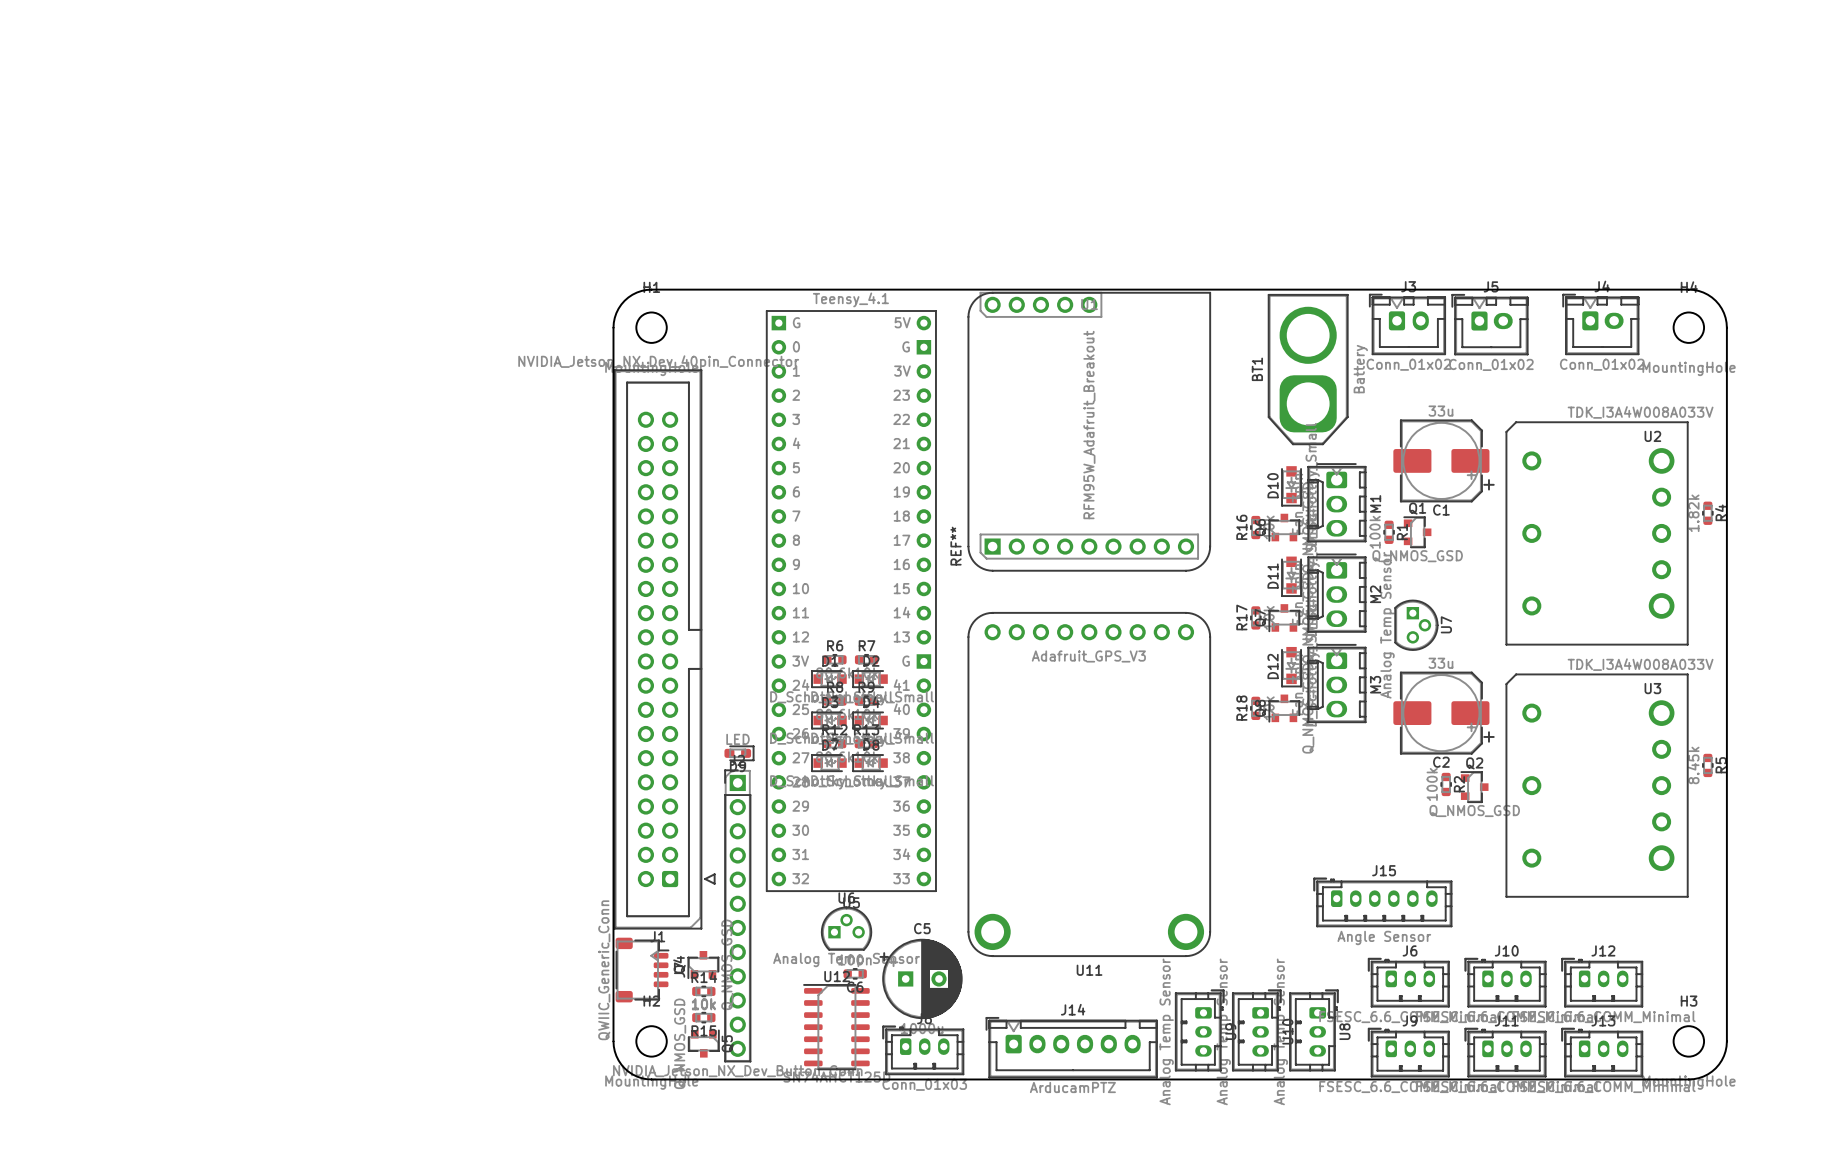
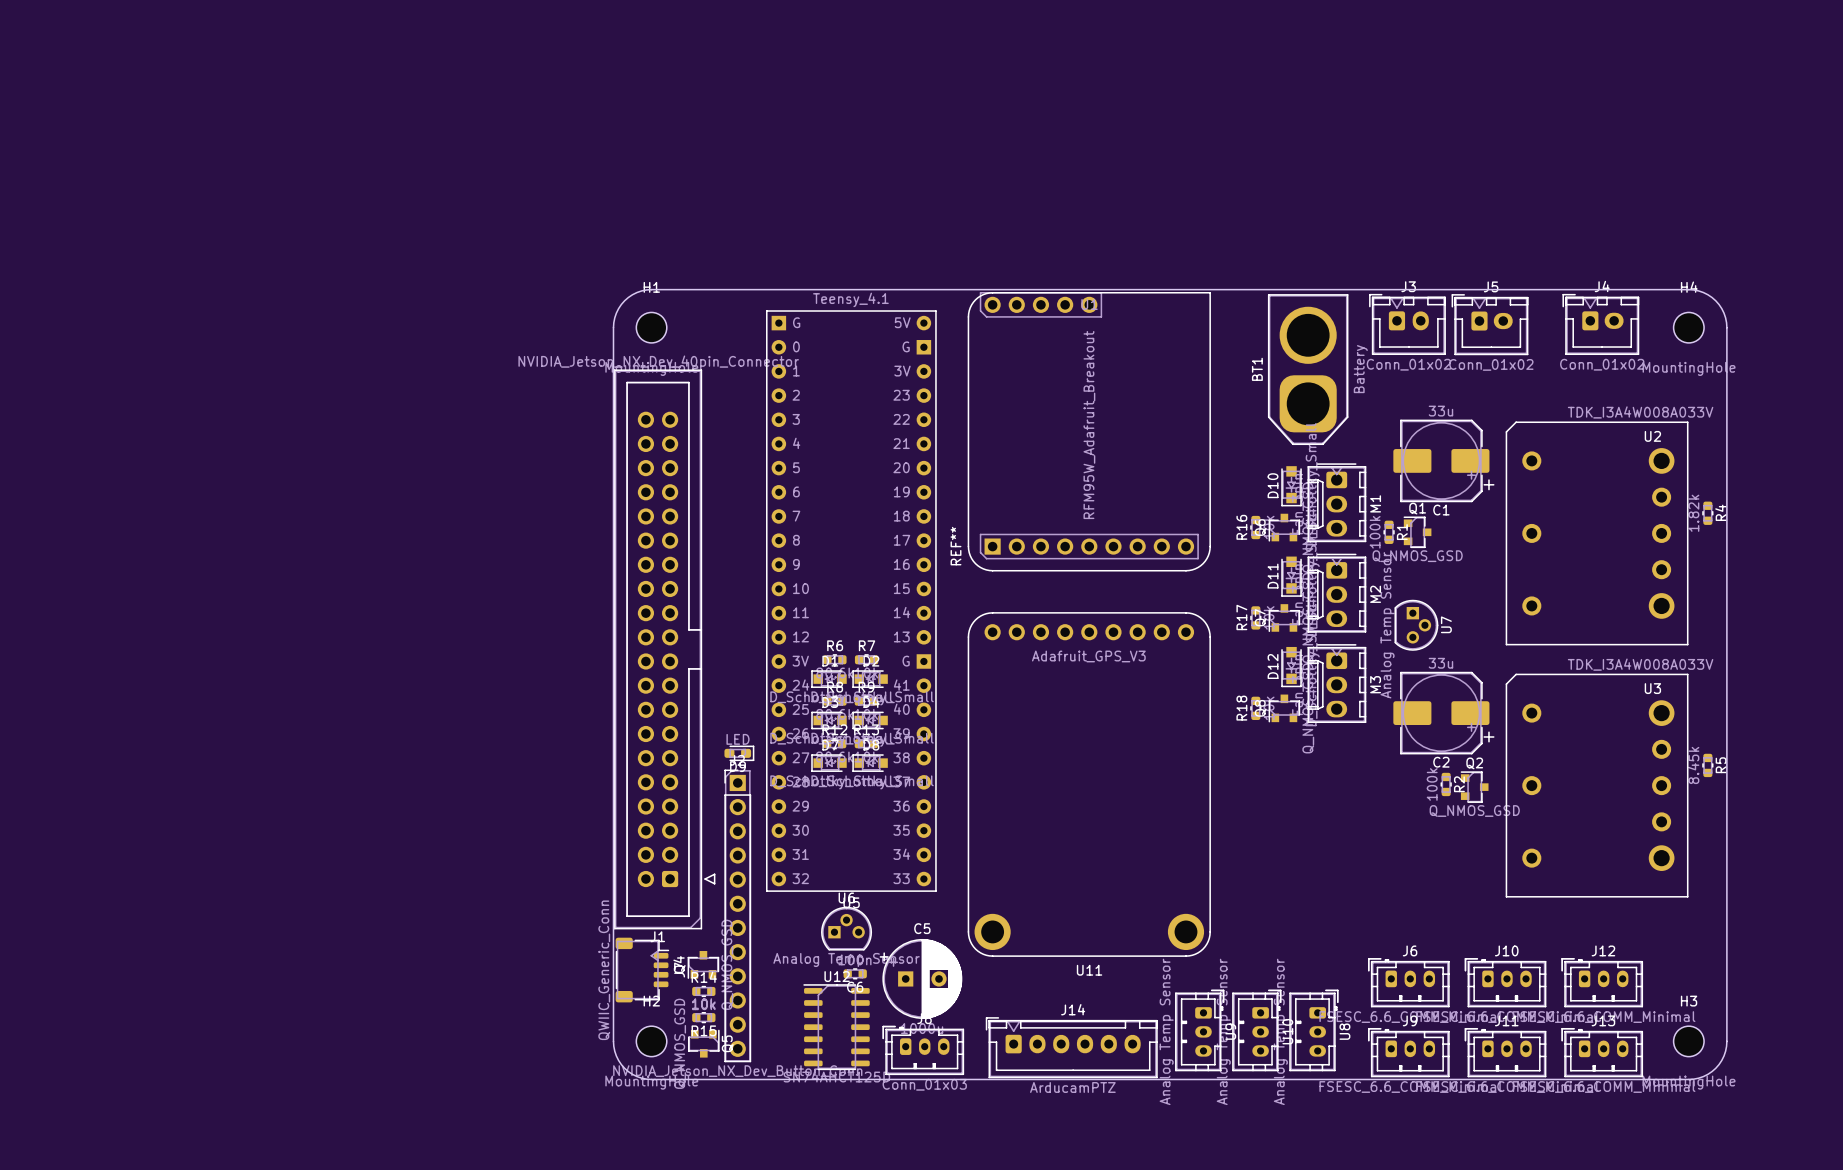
J15: Angle Sensor (1382, 902) -> none

